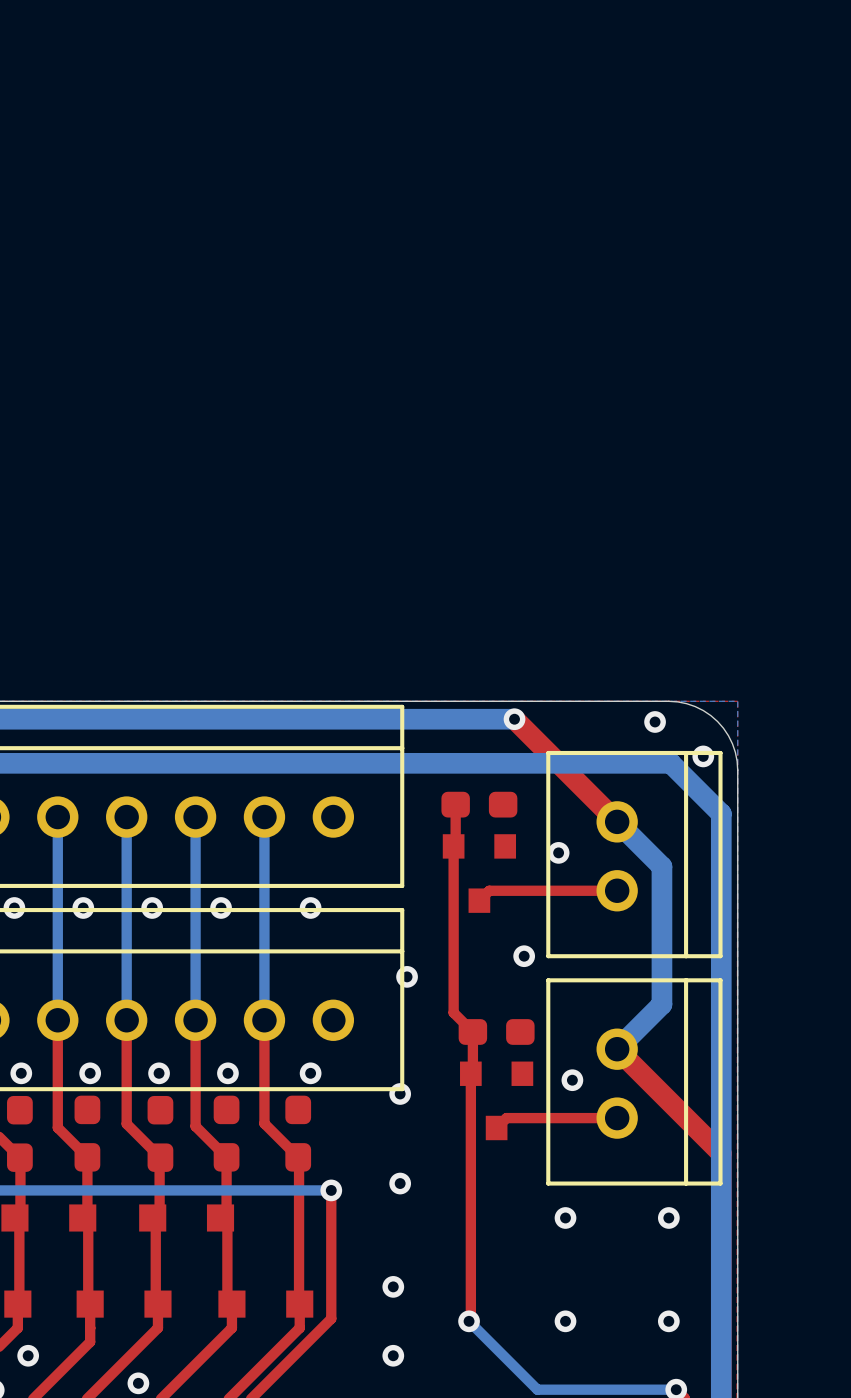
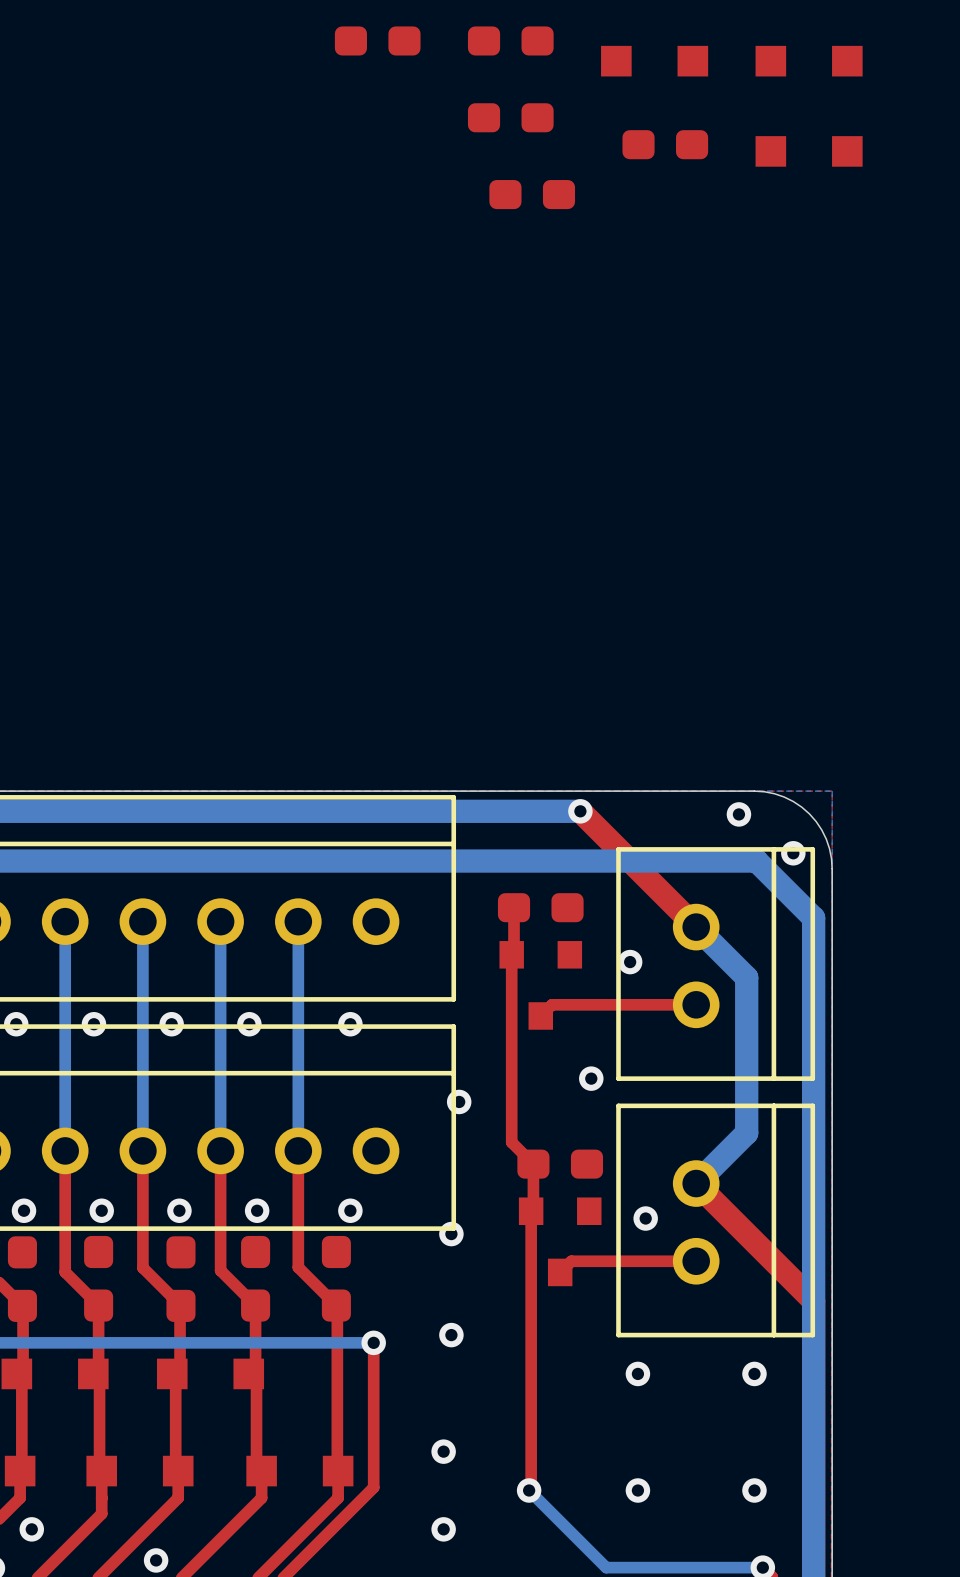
part: none -> (377, 40)
part: none -> (510, 40)
part: none -> (654, 61)
part: none -> (809, 61)
part: none -> (510, 117)
part: none -> (665, 144)
part: none -> (809, 151)
part: none -> (532, 194)

